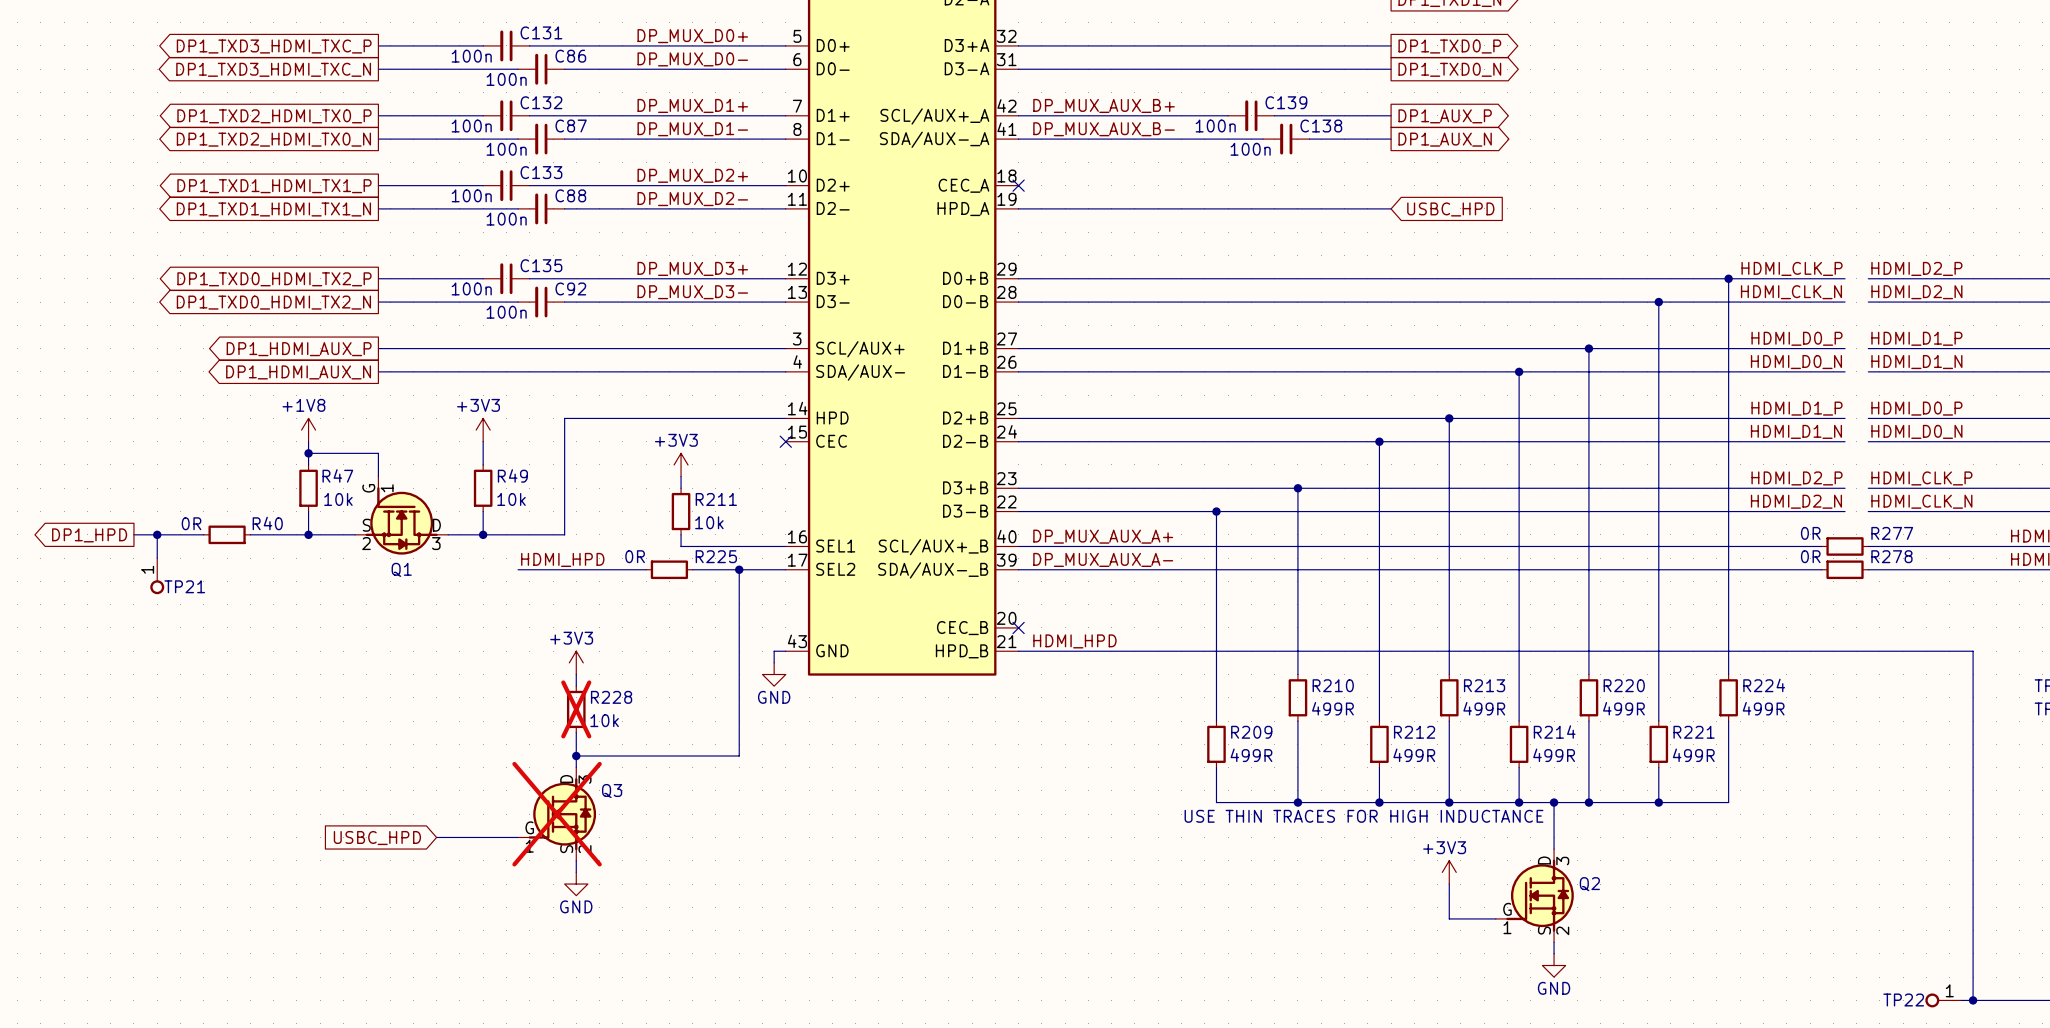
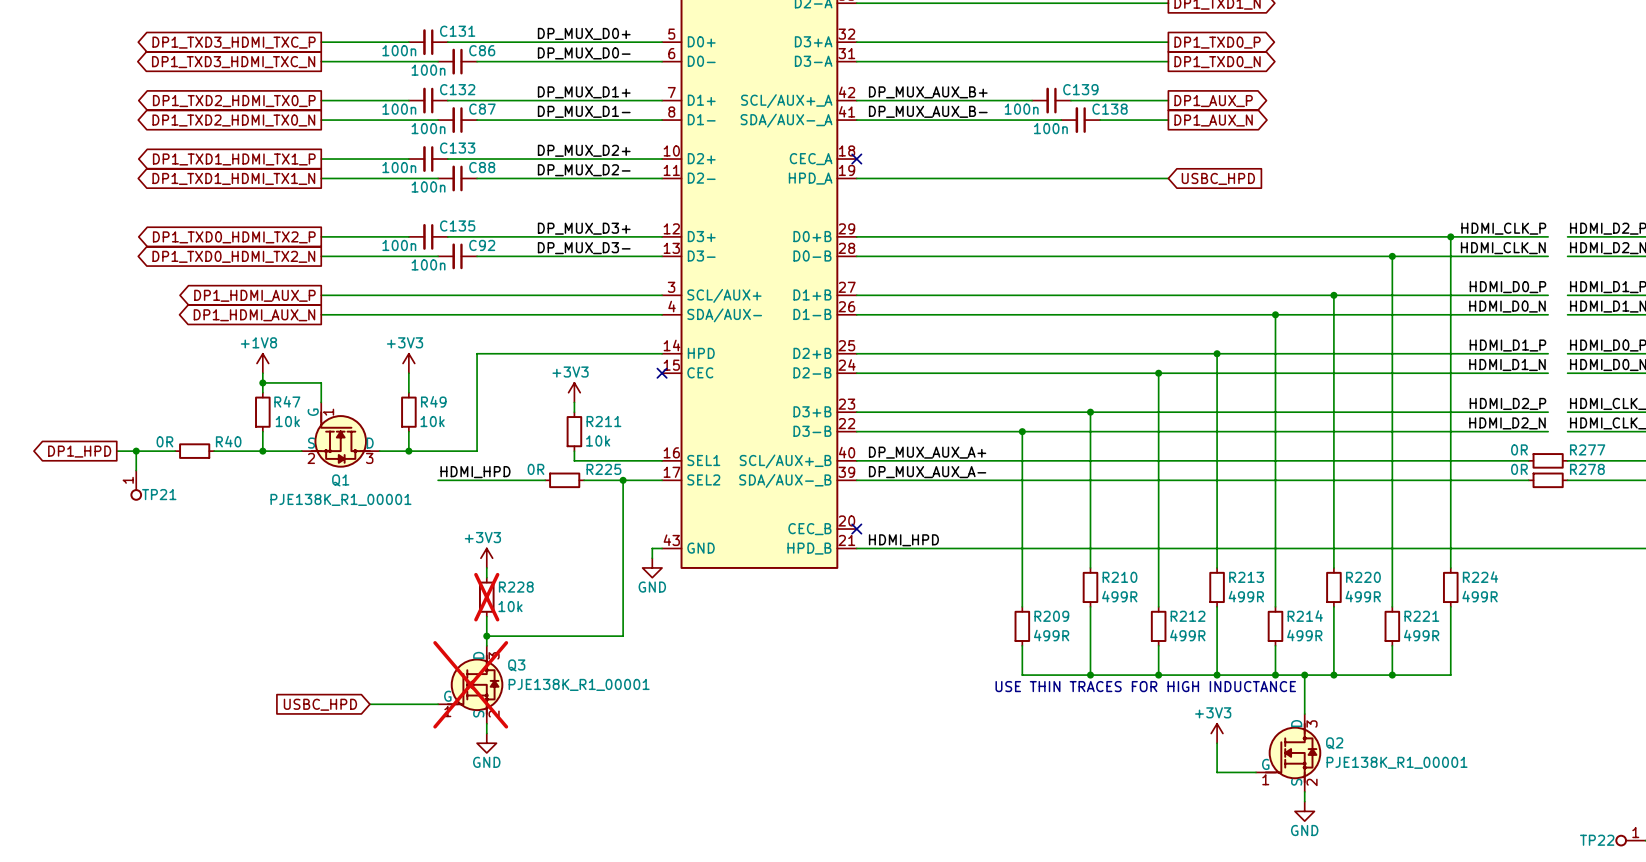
Q1 text: none -> PJE138K_R1_00001 (340, 499)
Q3 text: none -> PJE138K_R1_00001 (579, 684)
Q2 text: none -> PJE138K_R1_00001 (1397, 762)

